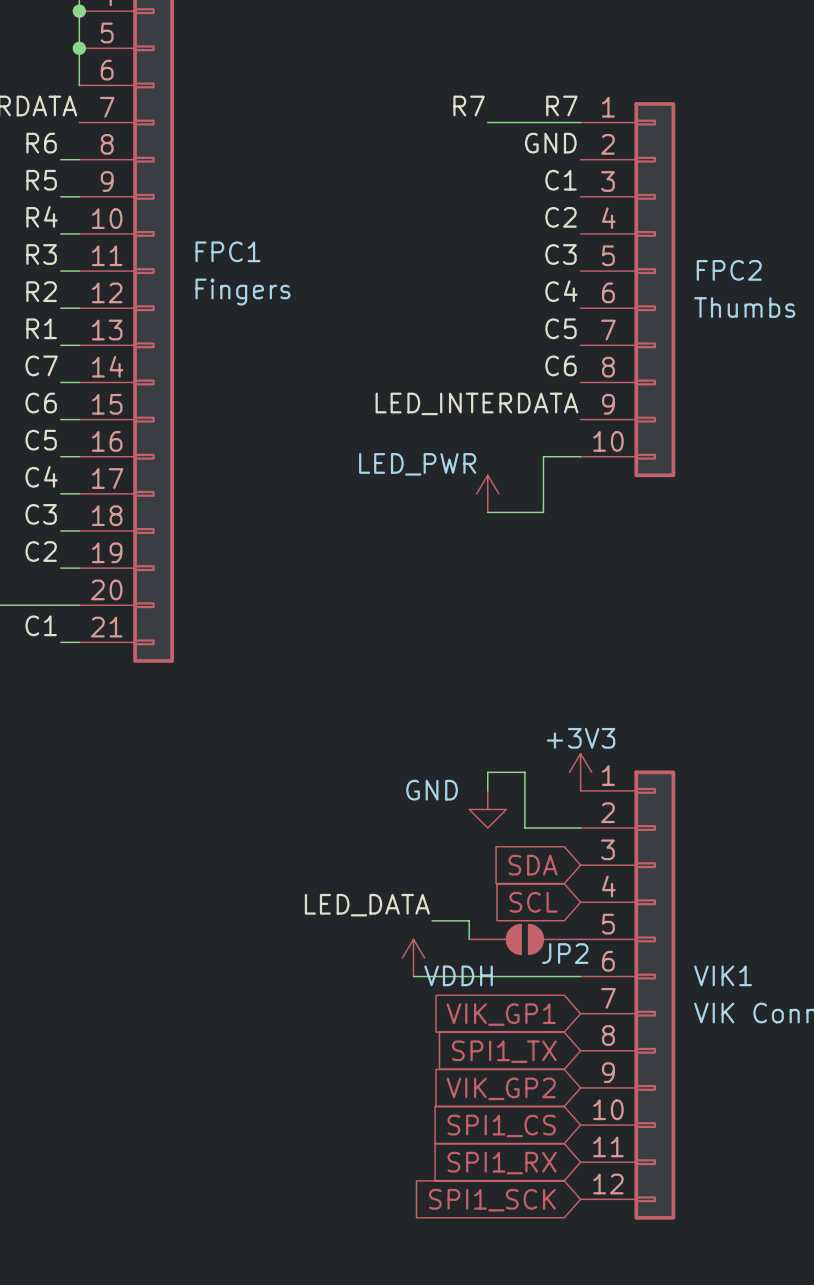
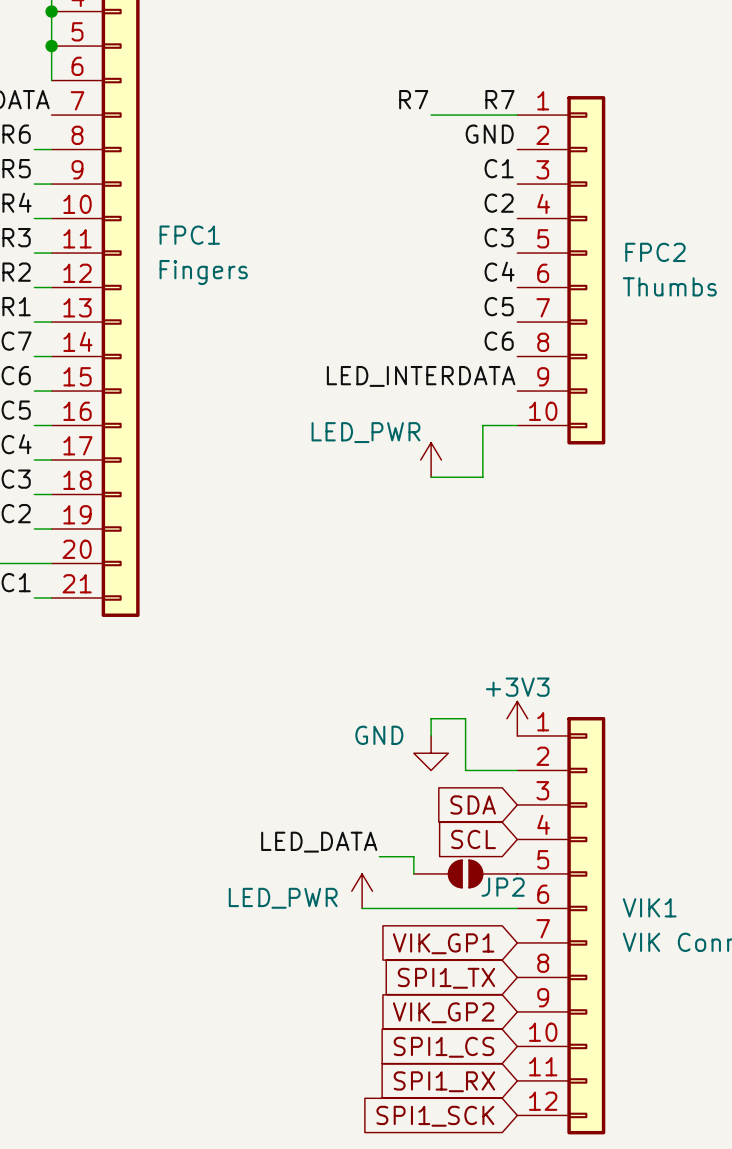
power symbol: VDDH (413, 957) -> LED_PWR (362, 891)

